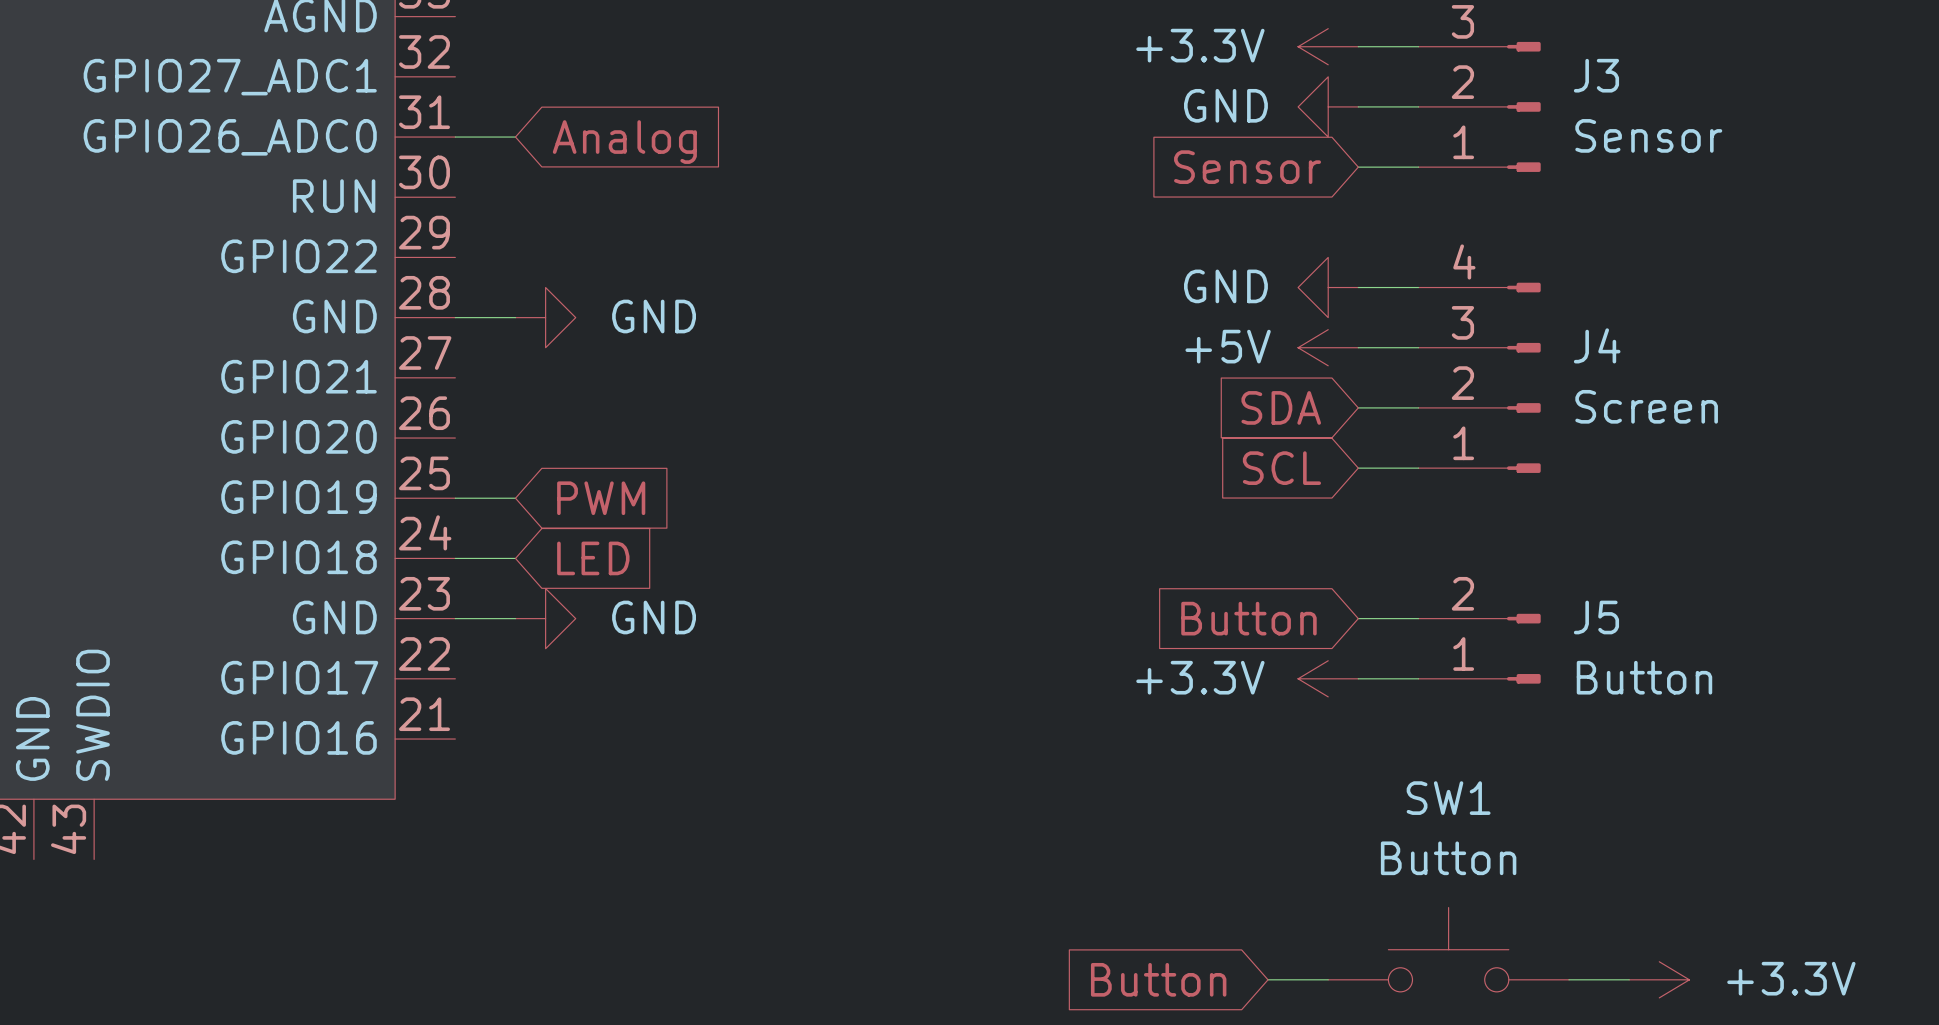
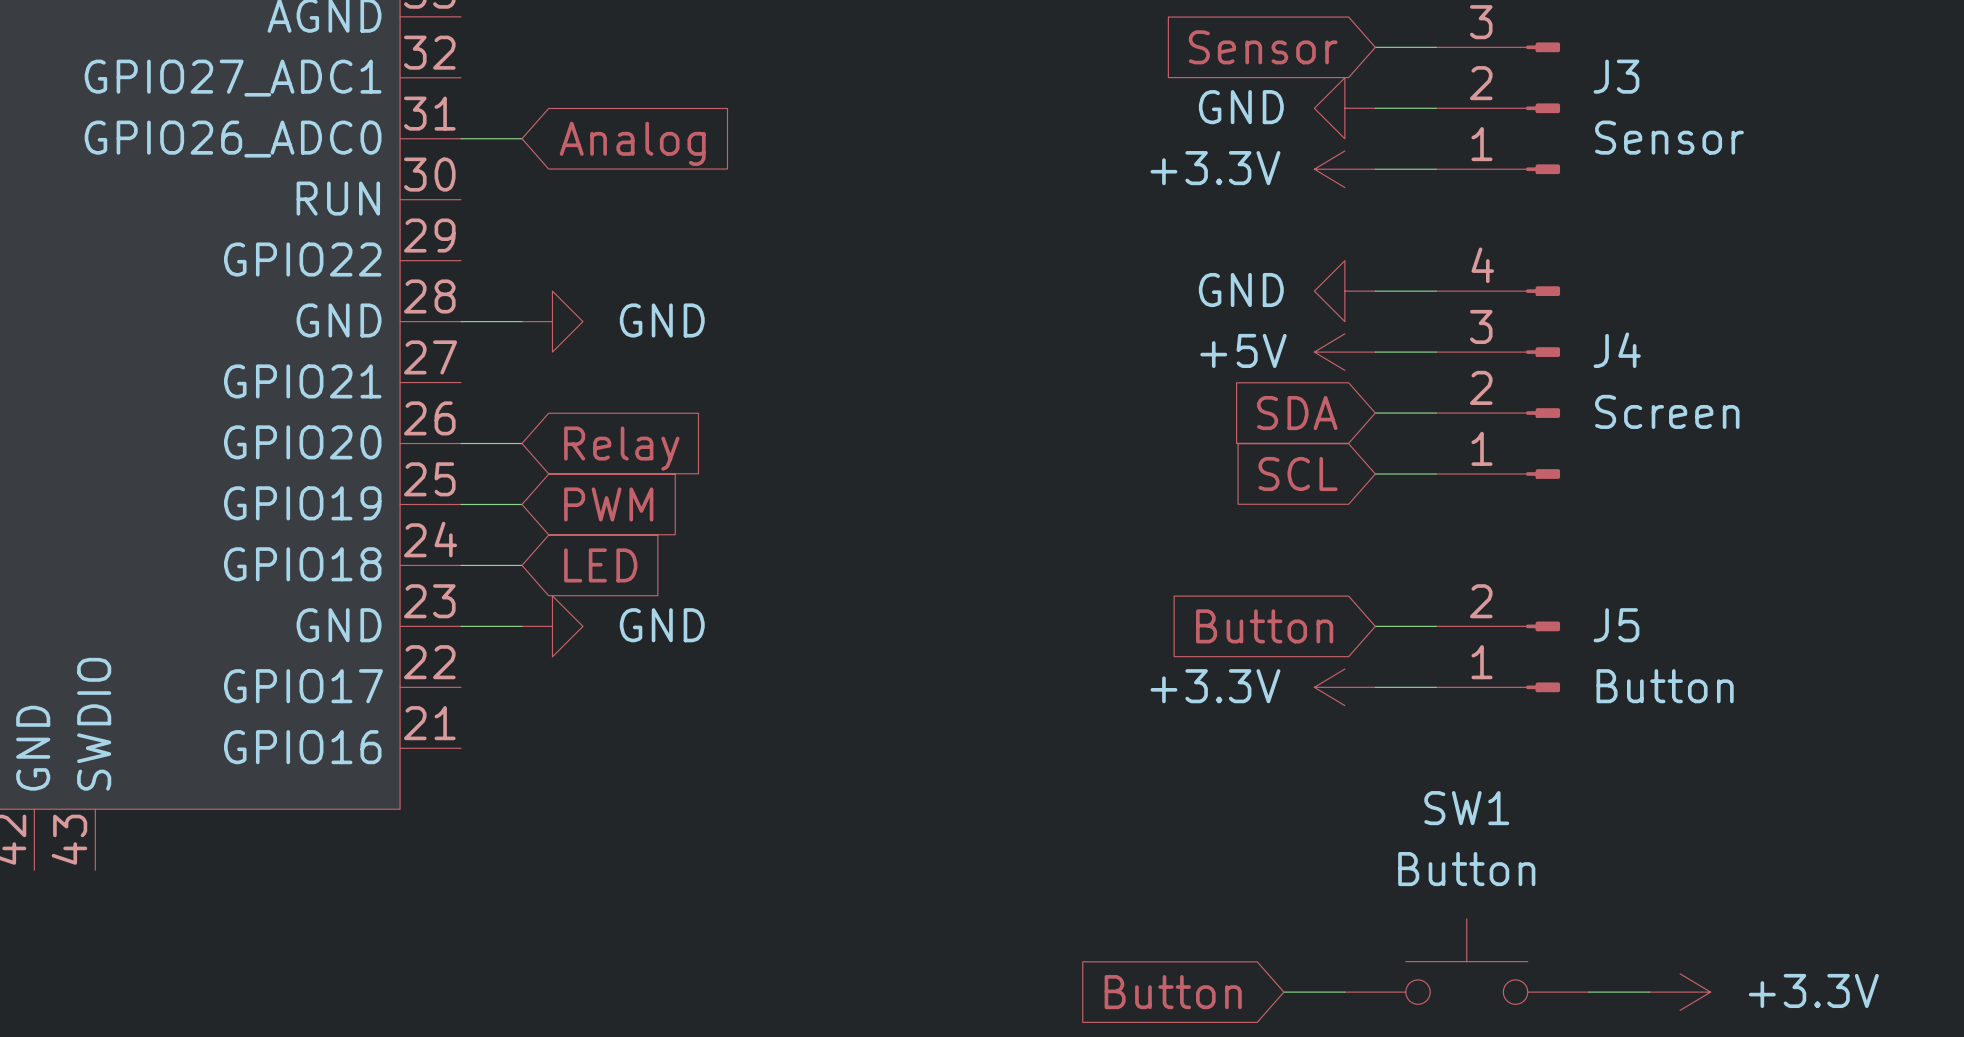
power symbol position: +3.3V (1328, 46) -> +3.3V (1344, 169)
global label position: Sensor (1247, 167) -> Sensor (1263, 47)
wire: none -> (461, 443) (521, 443)
global label: none -> Relay (621, 448)

